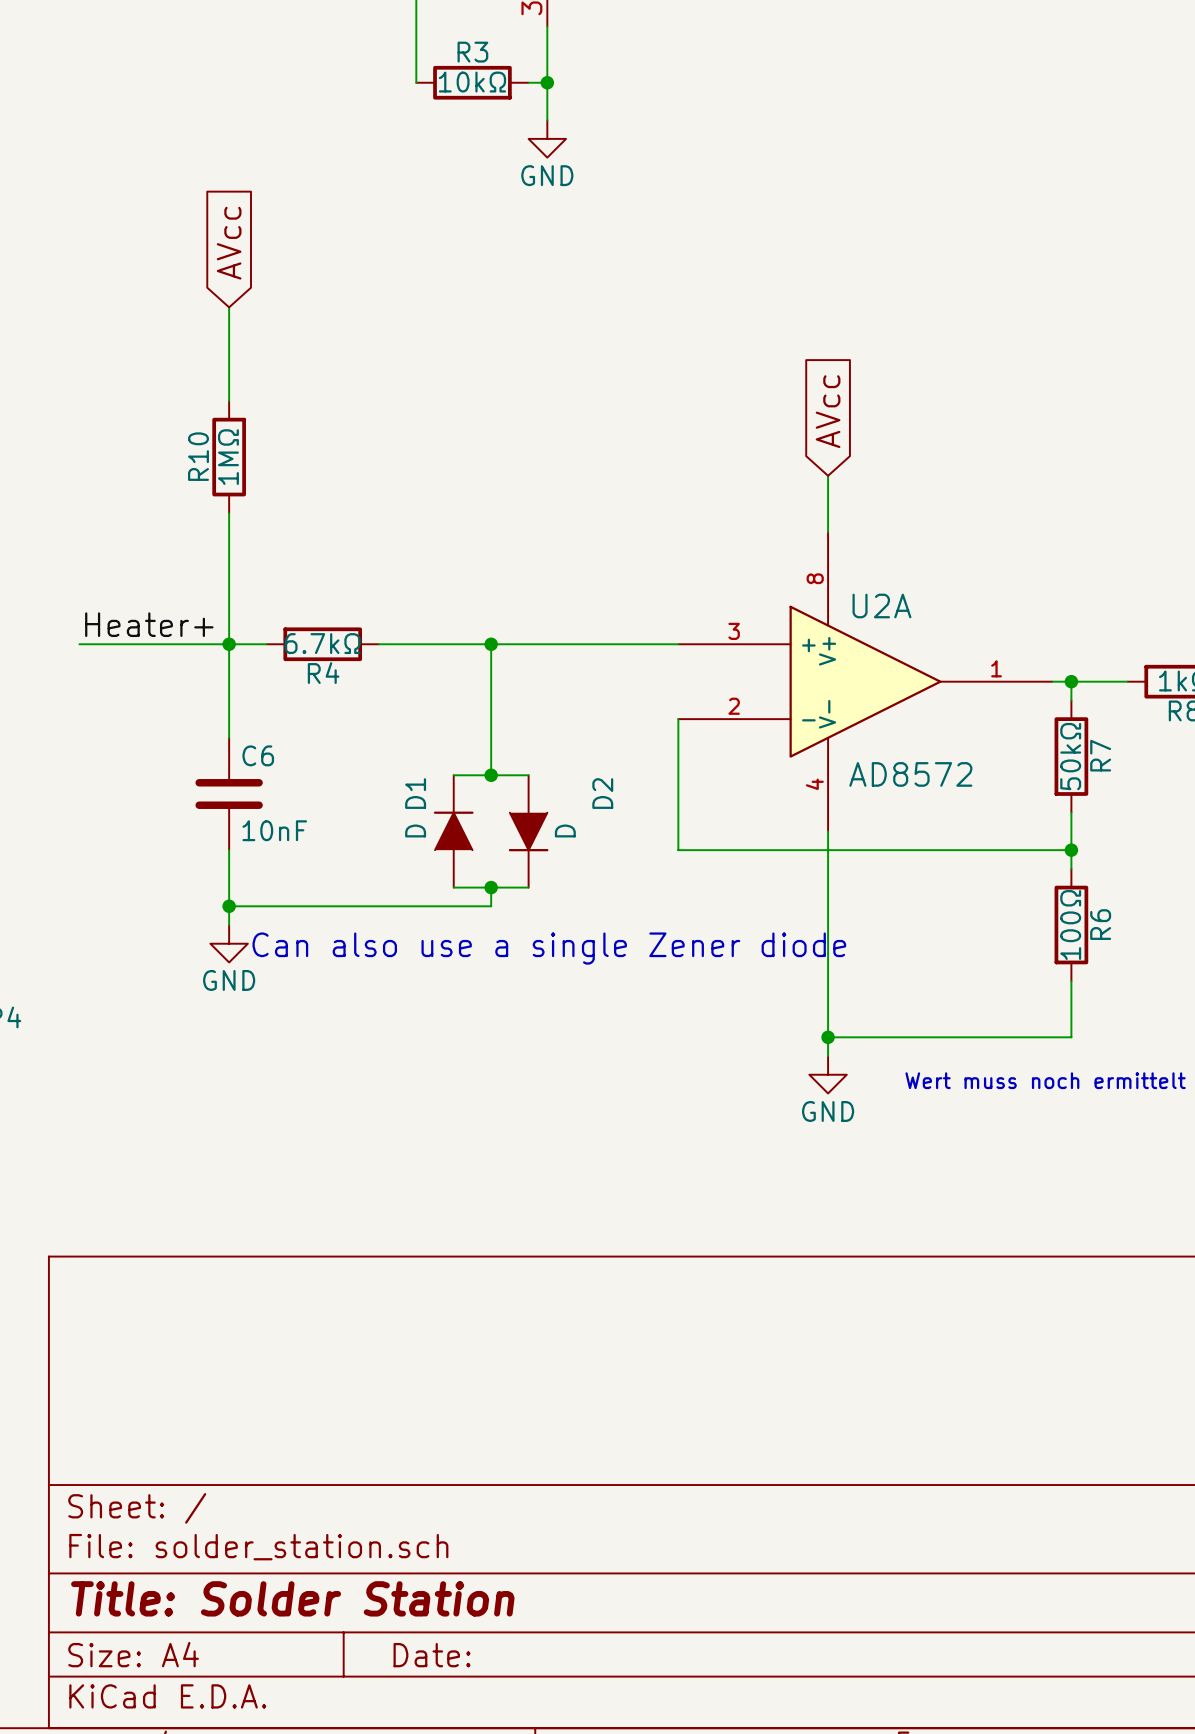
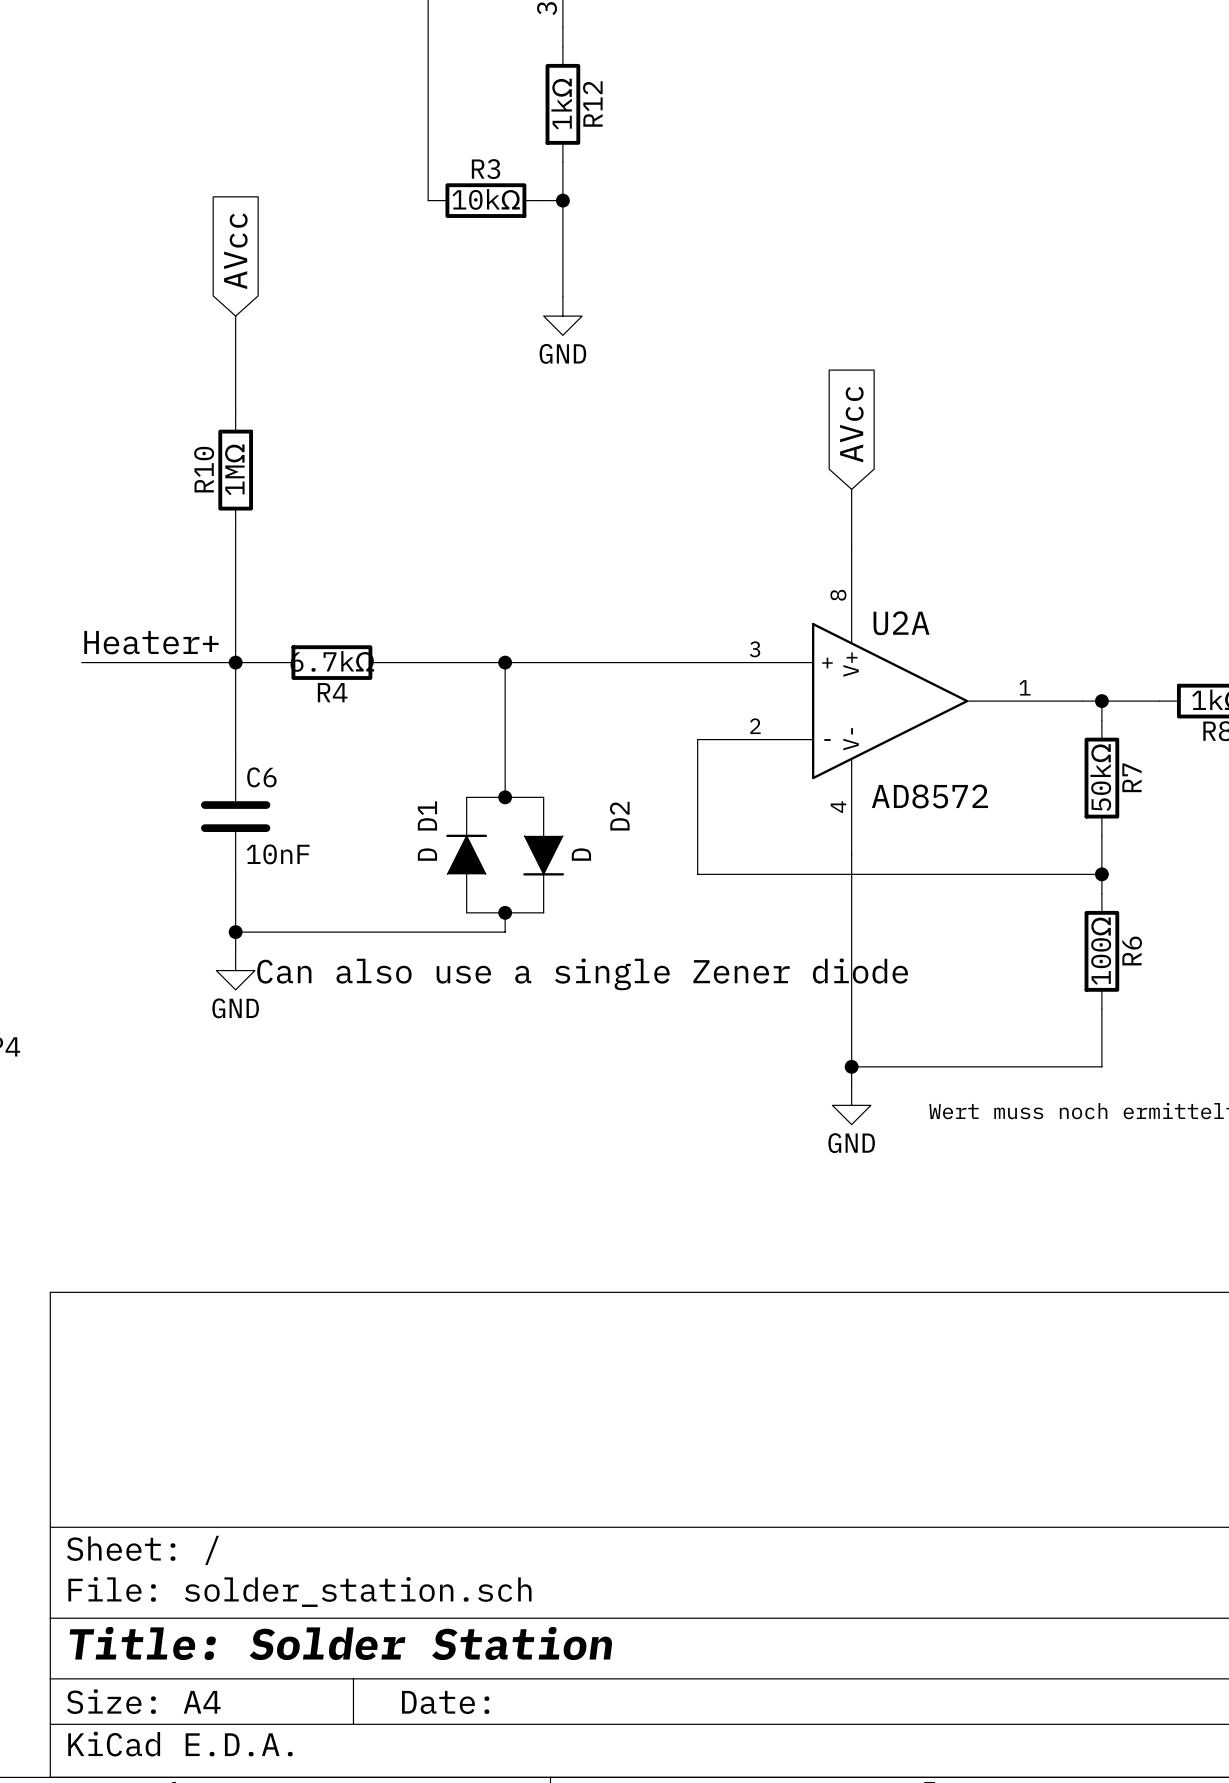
wire: (547, 45) (547, 120) -> none
wire: none -> (428, 85) (428, 200)
R3 position: (472, 82) -> (485, 200)
wire: (528, 82) (547, 82) -> (543, 200) (562, 200)
junction: (547, 82) -> none
R12: none -> 1kΩ (562, 104)
power symbol position: GND (547, 138) -> GND (562, 316)
wire: none -> (562, 162) (562, 296)
junction: none -> (562, 200)

